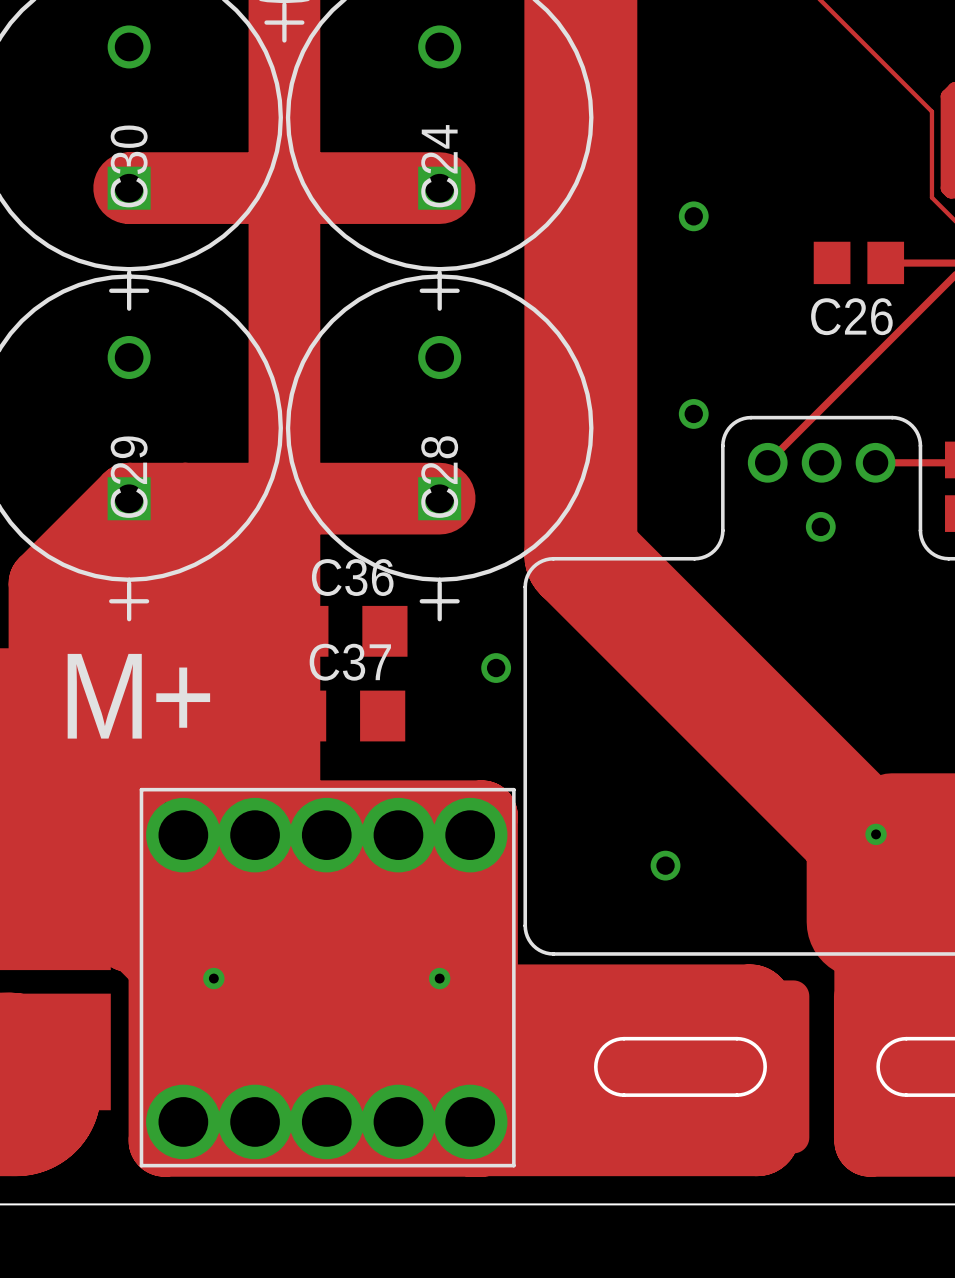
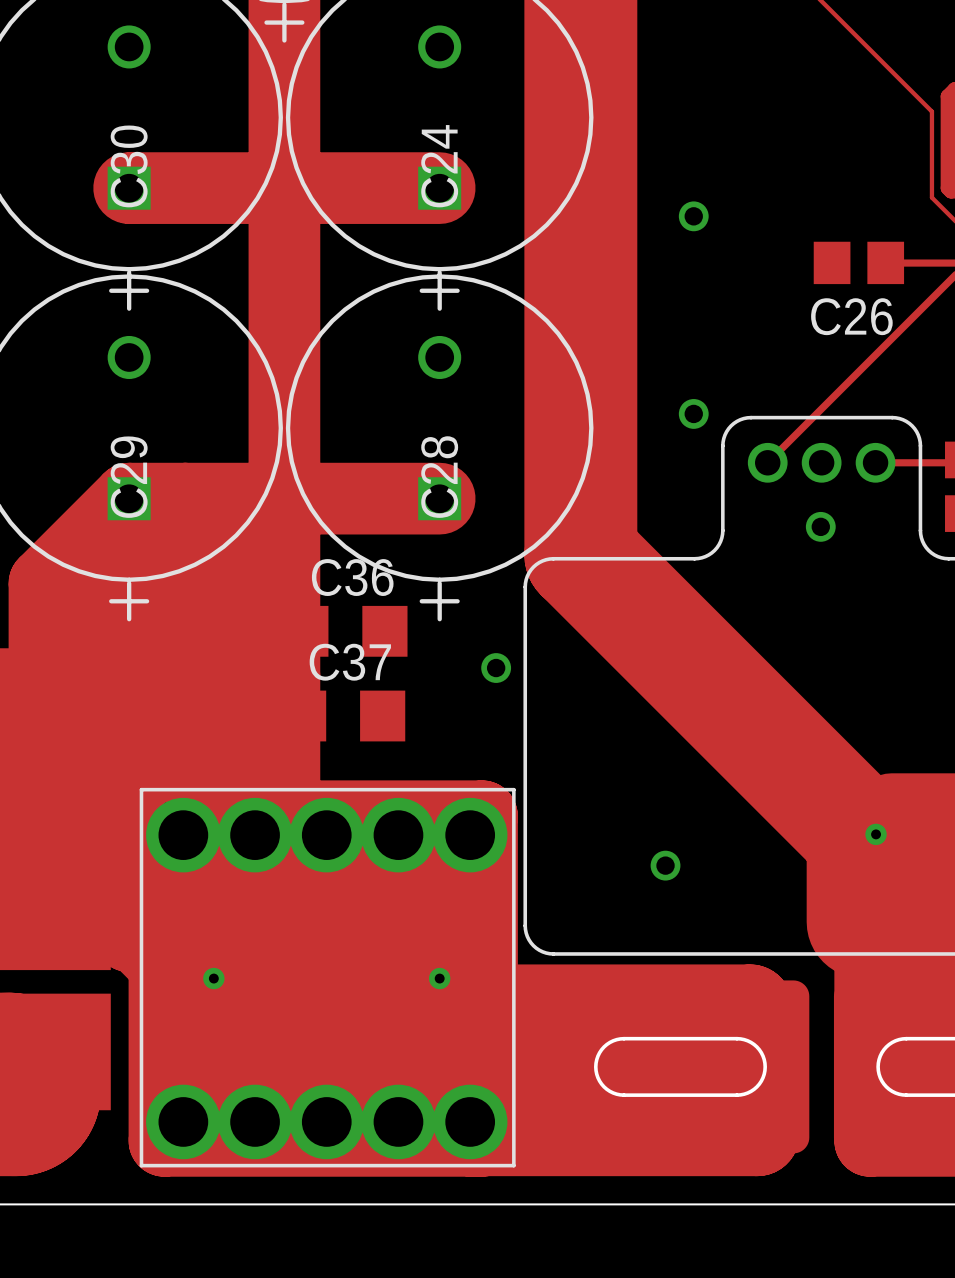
text: M+ (138, 696) -> none

